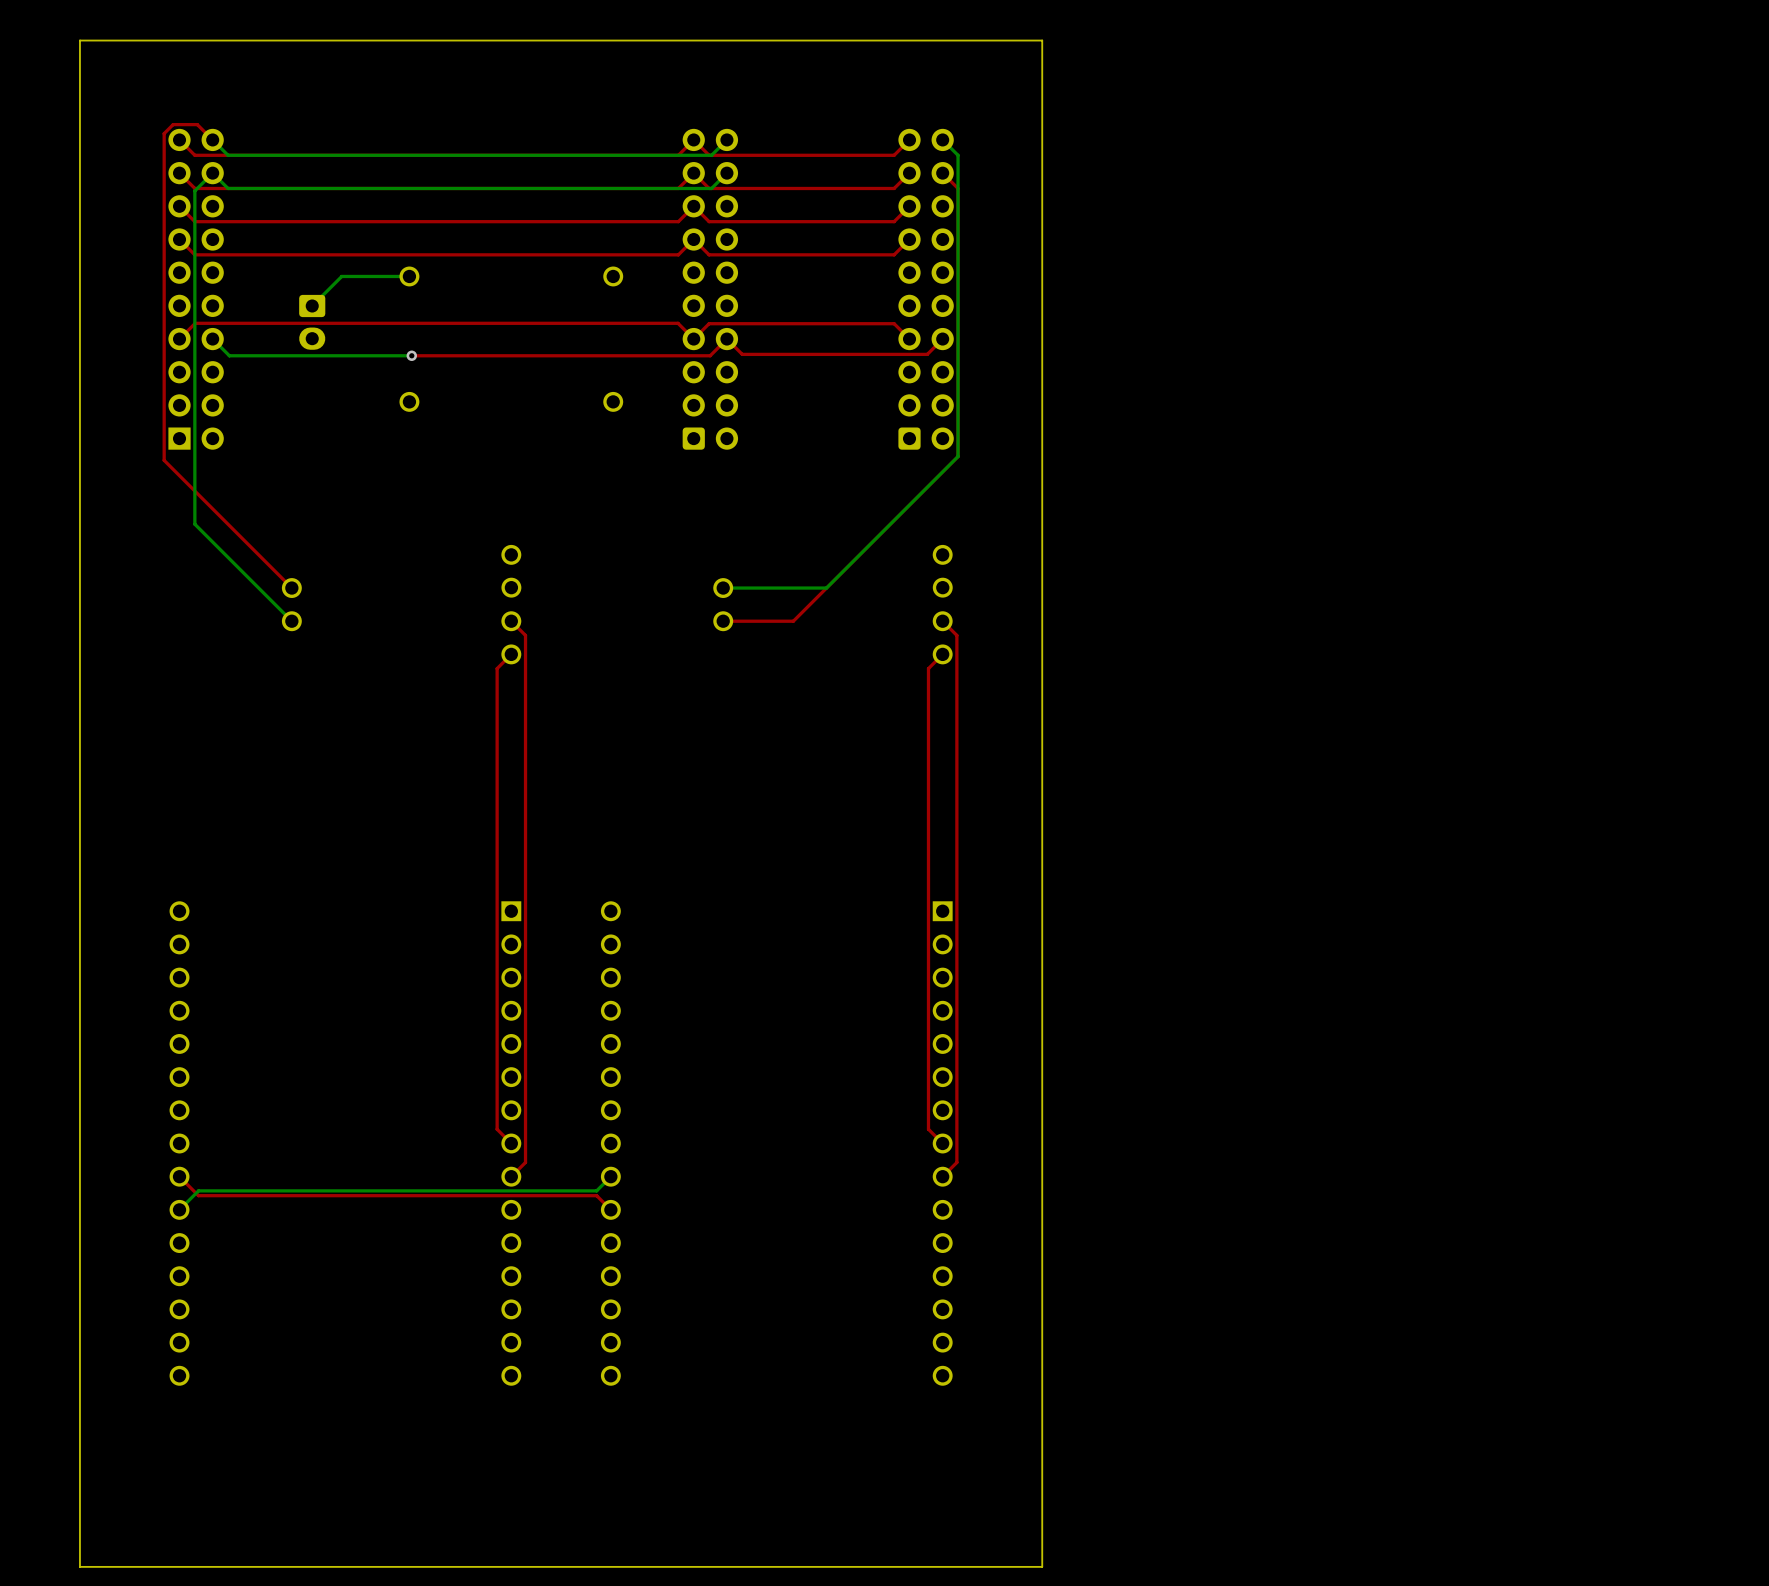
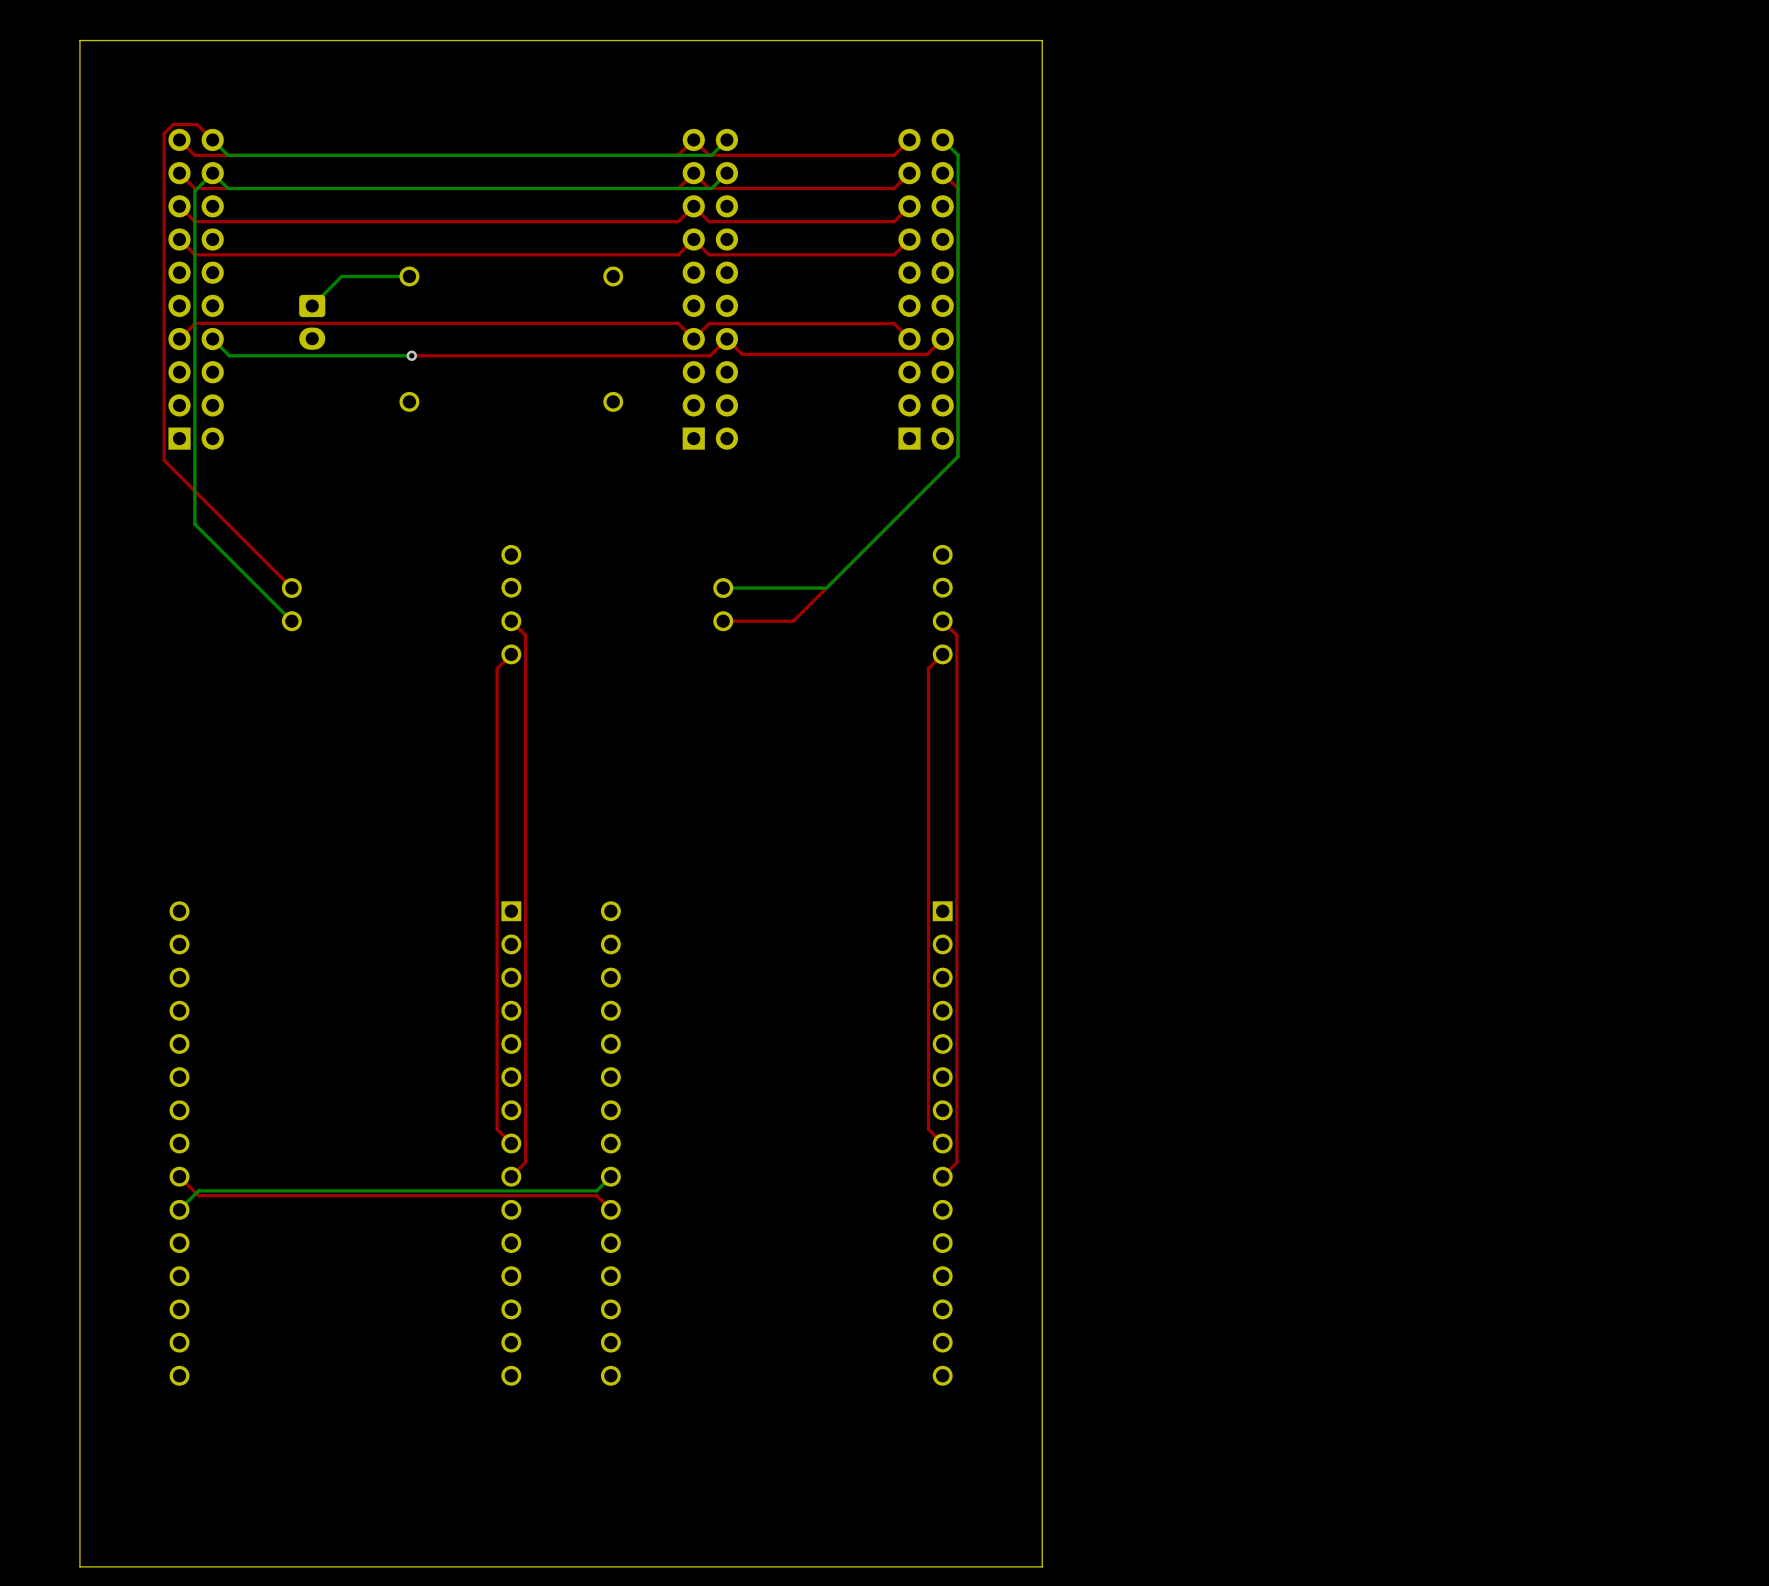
part footprint: [682, 128, 739, 450] -> [682, 128, 739, 450]
part footprint: [898, 128, 954, 450] -> [898, 128, 954, 450]

